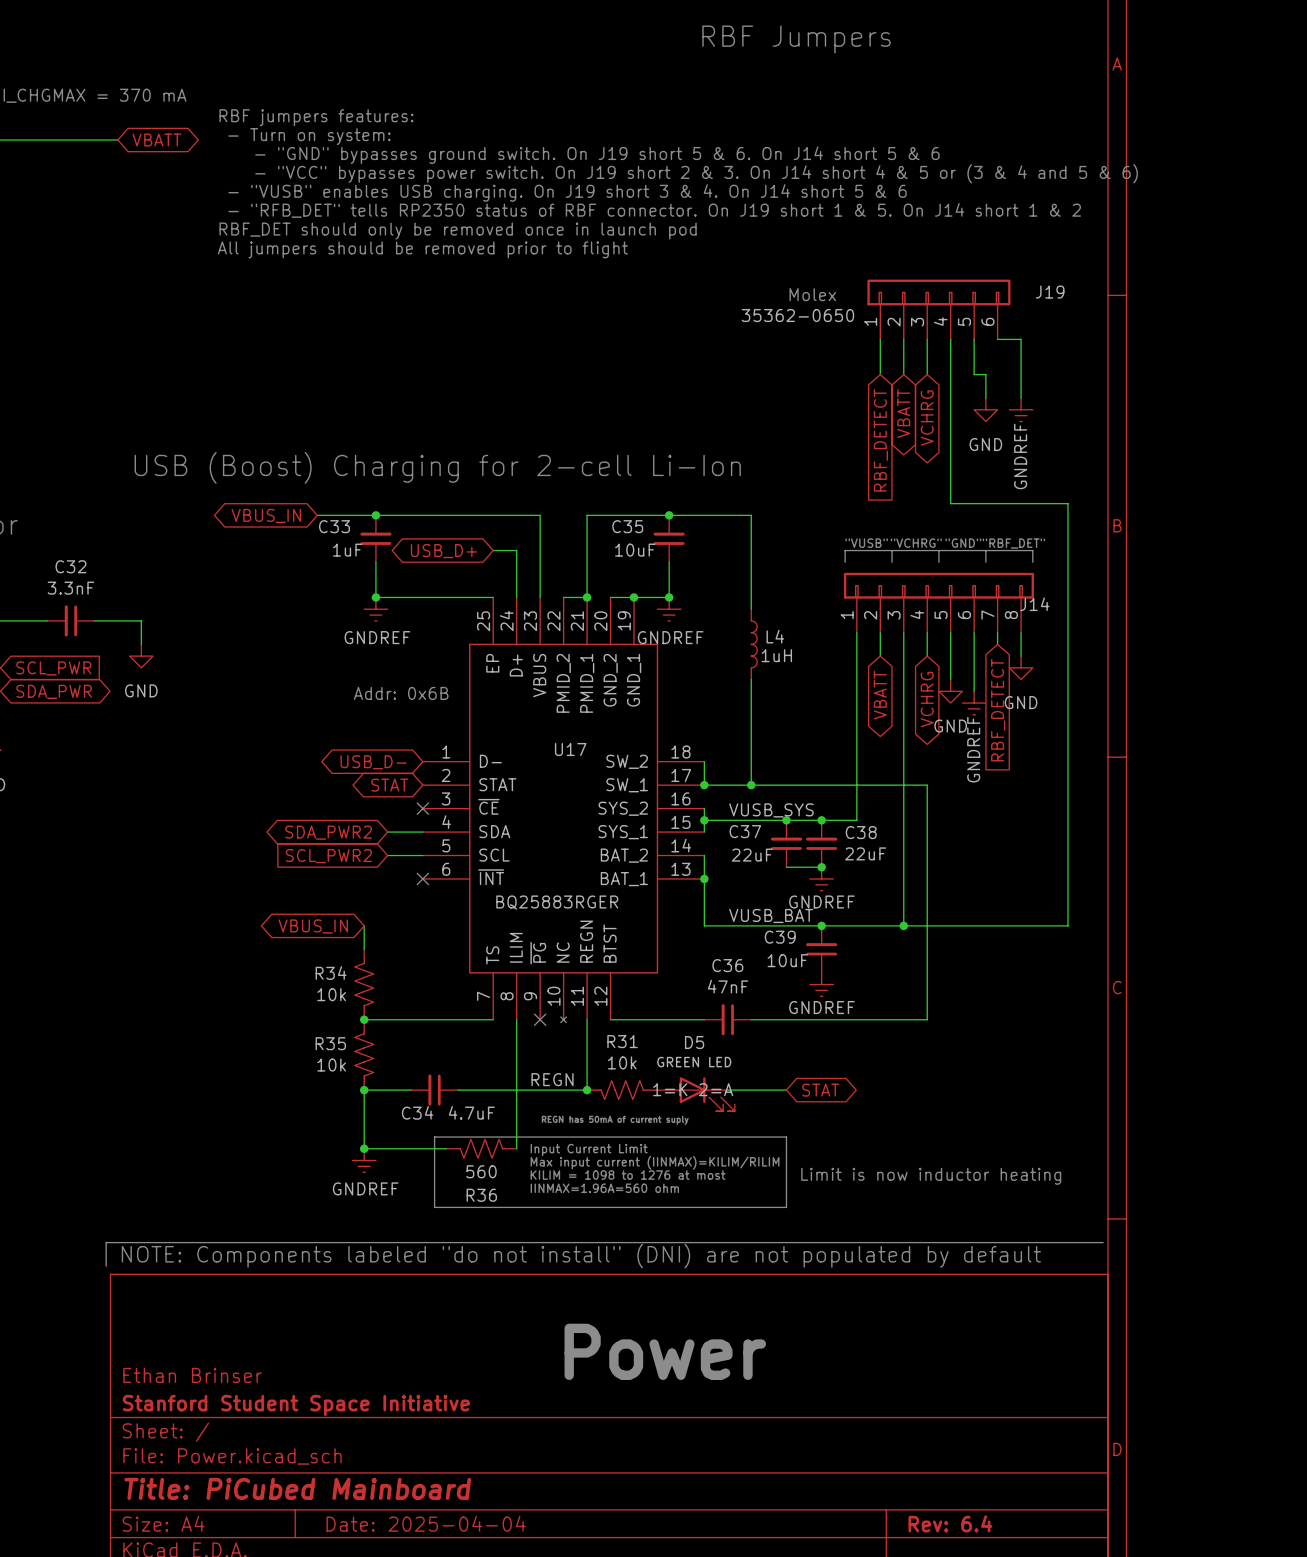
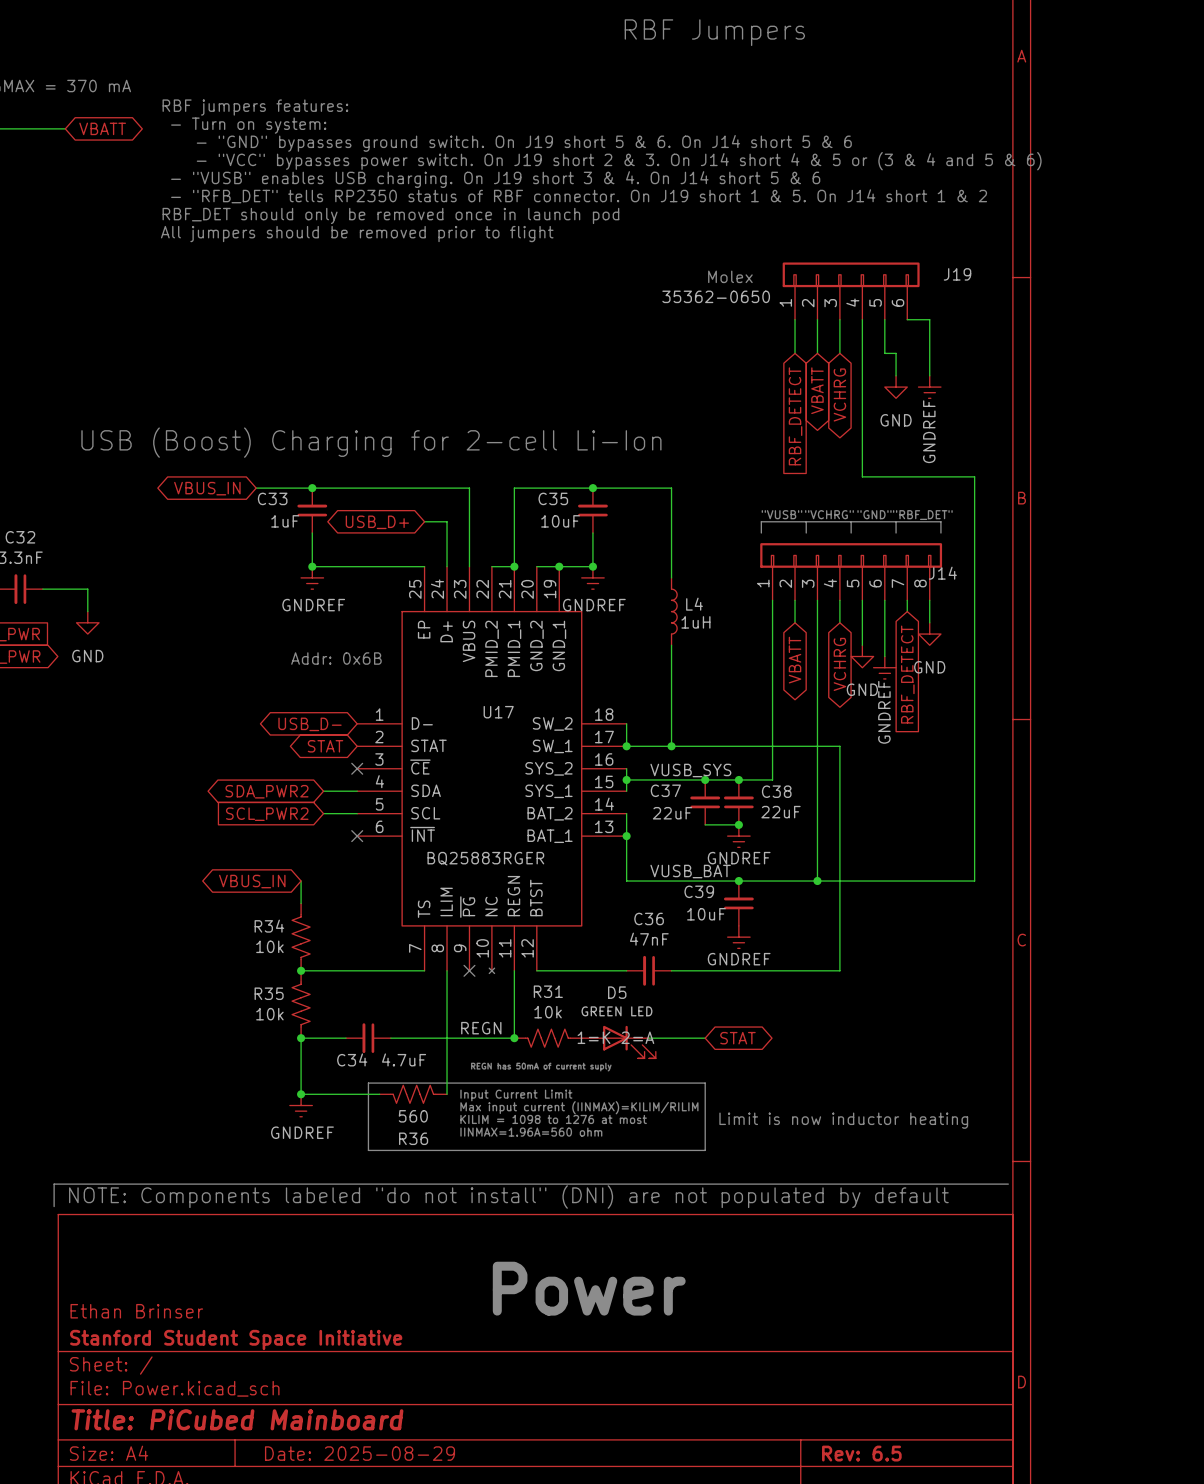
title block: Date: 2025-04-04 (426, 1523) -> Date: 2025-08-29 (360, 1453)
title block: Rev: 6.4 (950, 1523) -> Rev: 6.5 (861, 1453)

